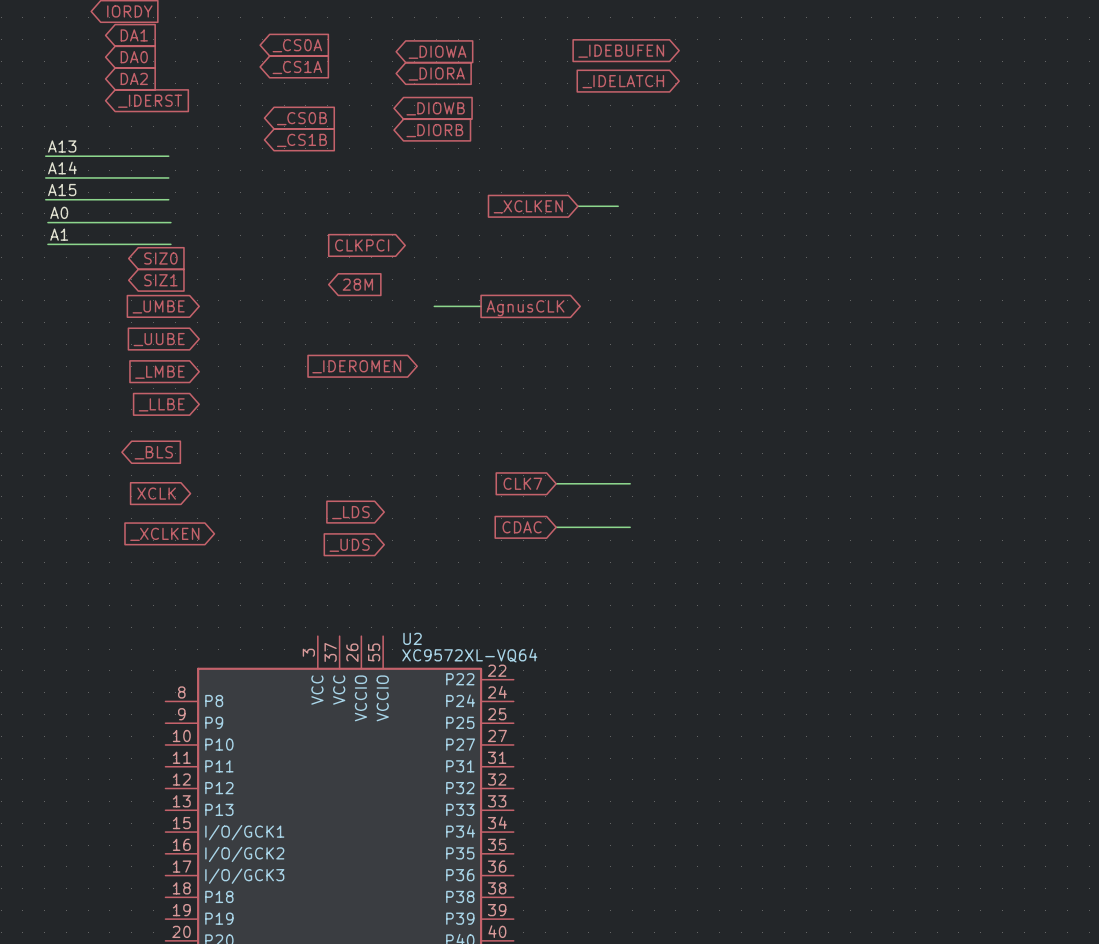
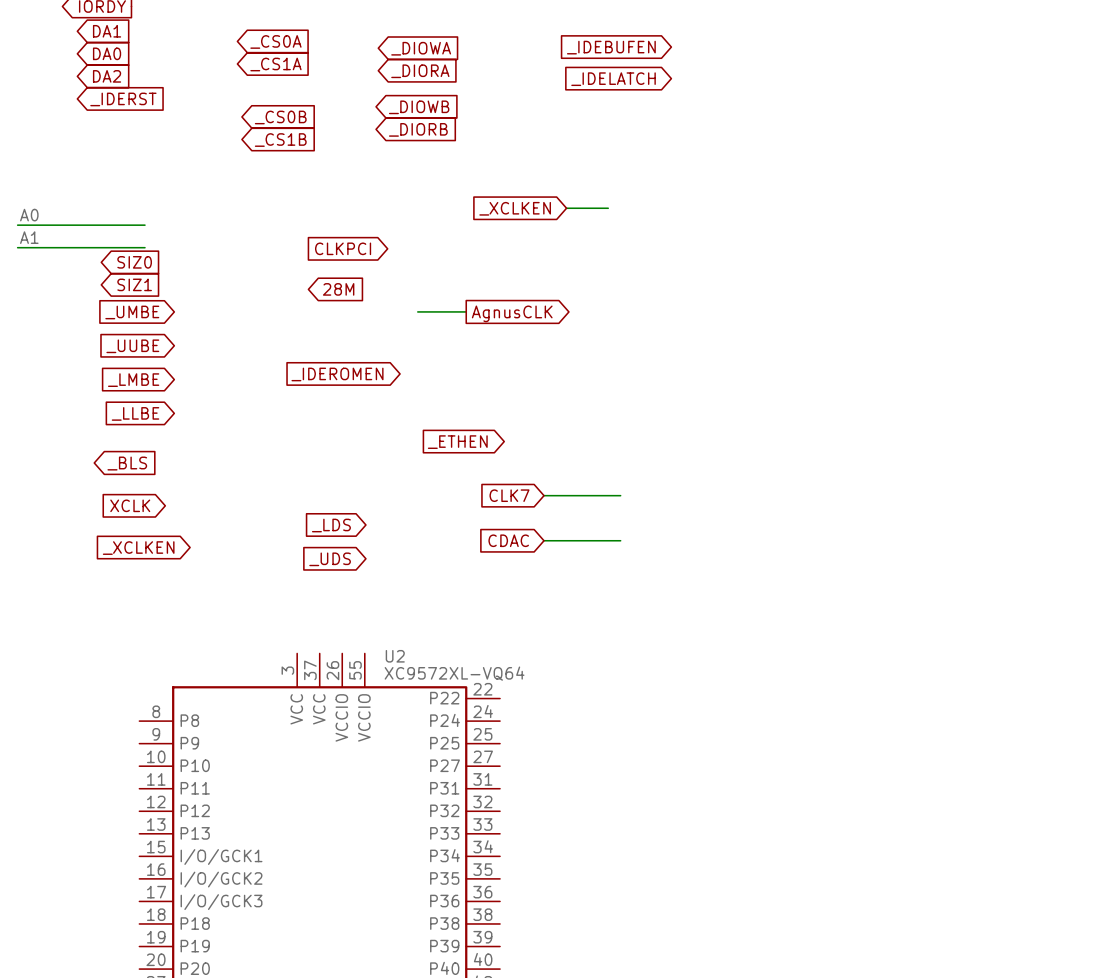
label: A13 (62, 146) -> none
wire: (45, 156) (168, 156) -> none
label: A14 (62, 168) -> none
wire: (45, 177) (168, 177) -> none
label: A15 (62, 190) -> none
wire: (45, 199) (168, 199) -> none
global label: none -> _ETHEN (457, 442)

